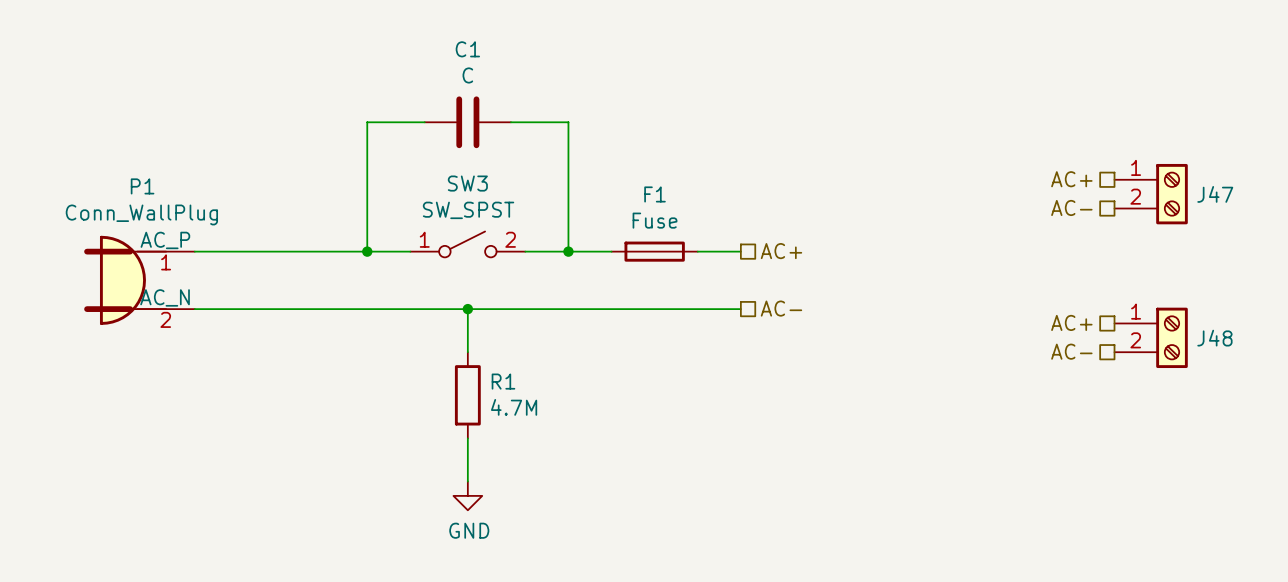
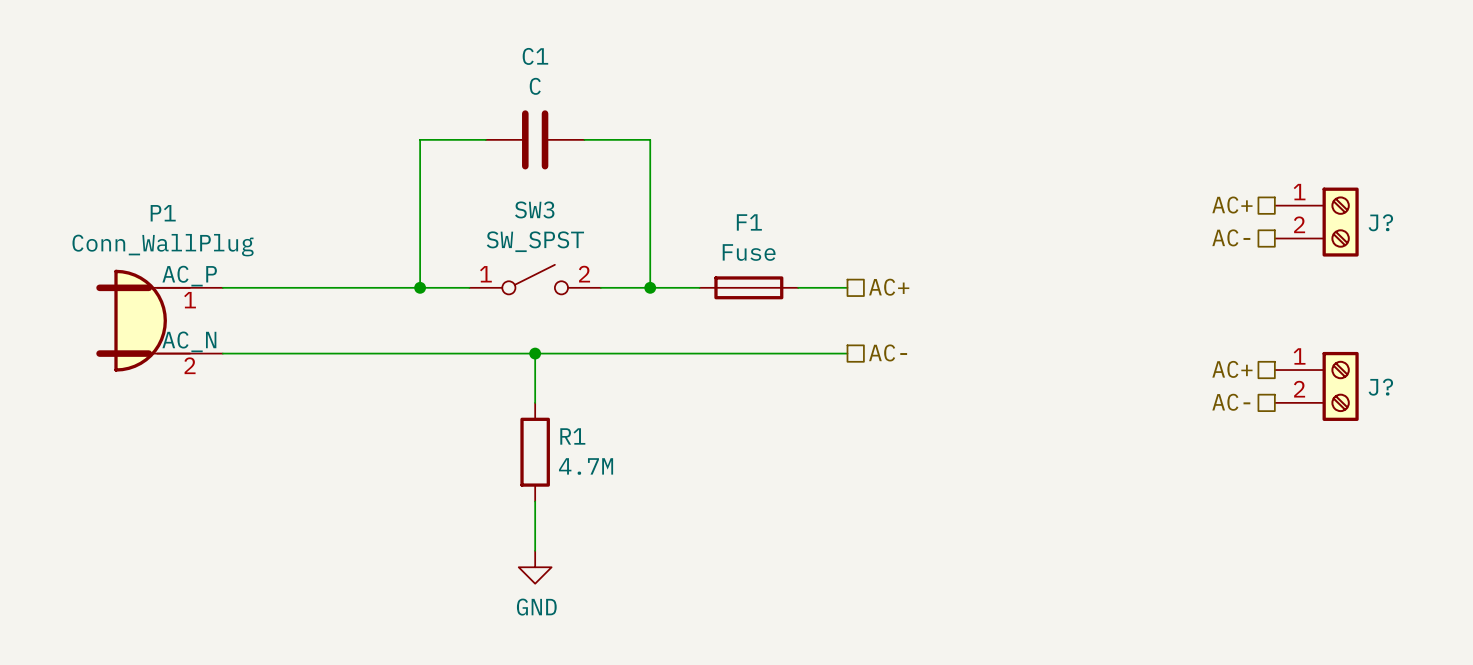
J47 name: J47 (1215, 194) -> J? (1380, 222)
J48 name: J48 (1214, 338) -> J? (1380, 387)

